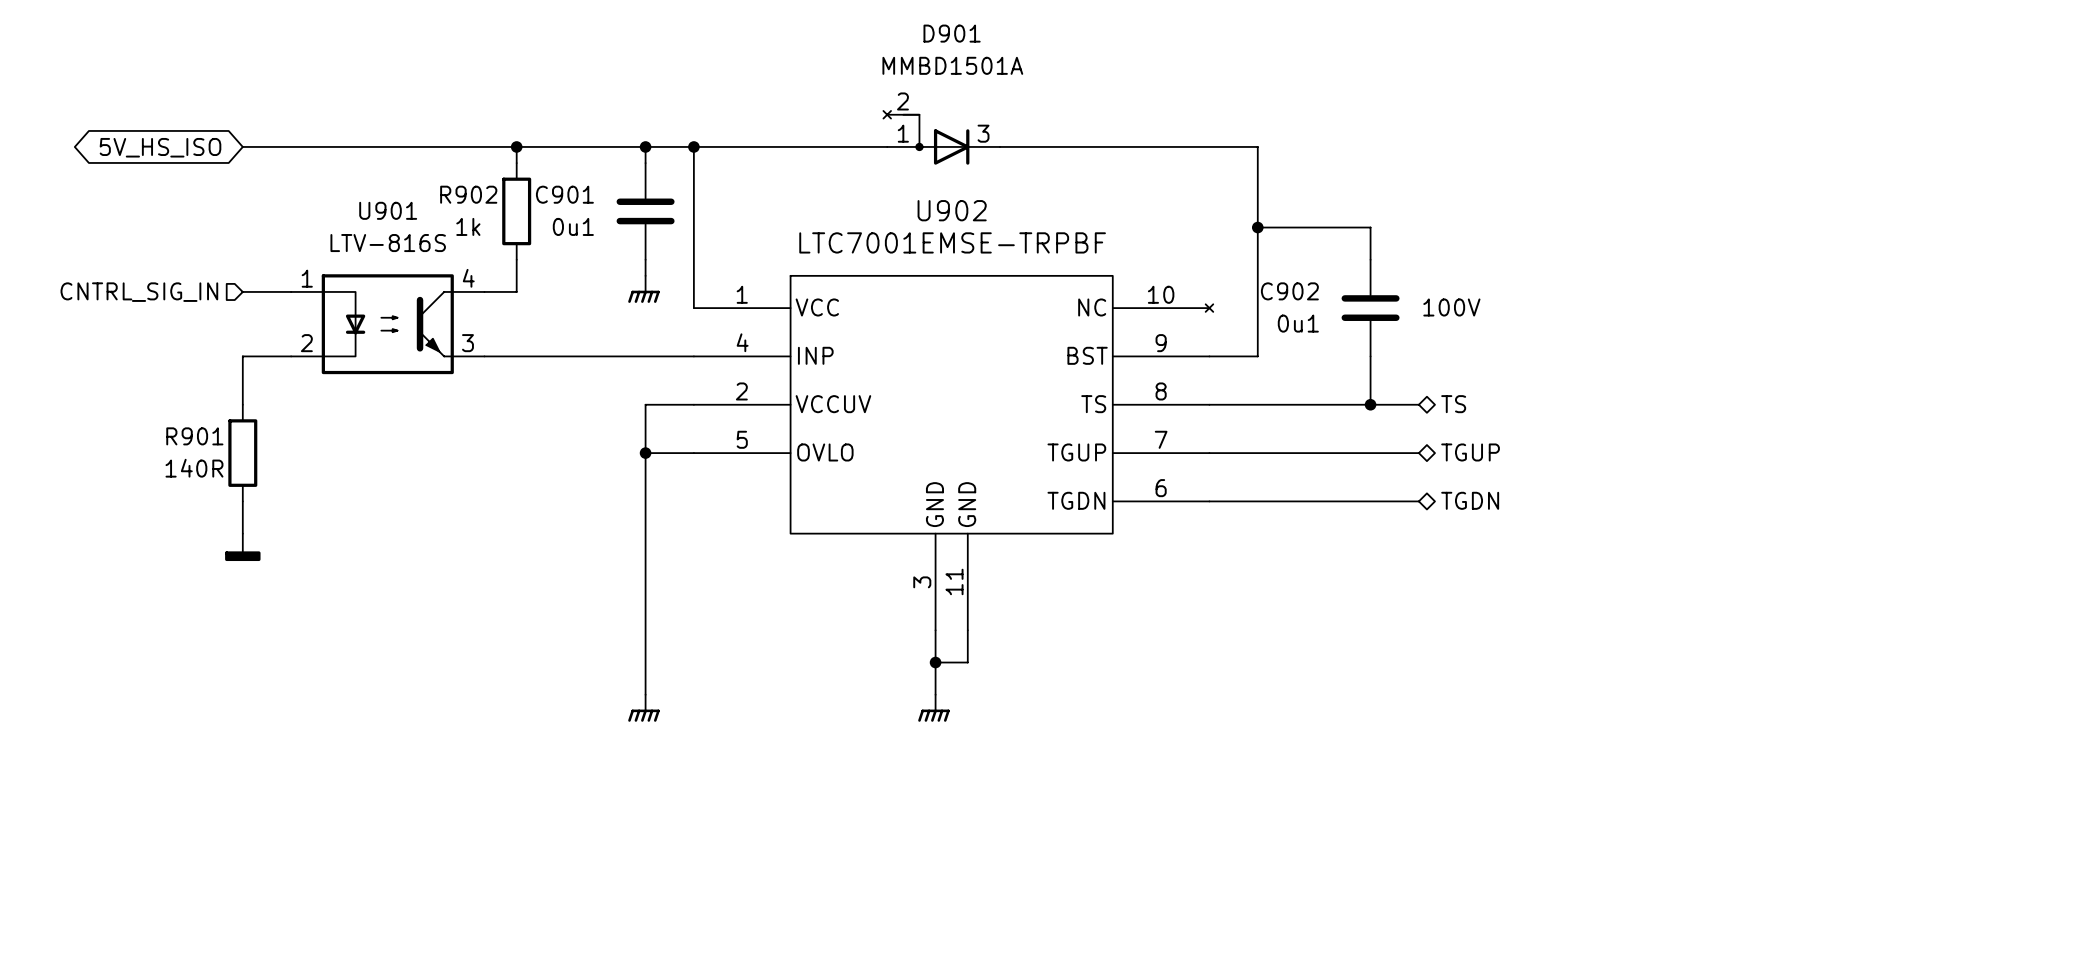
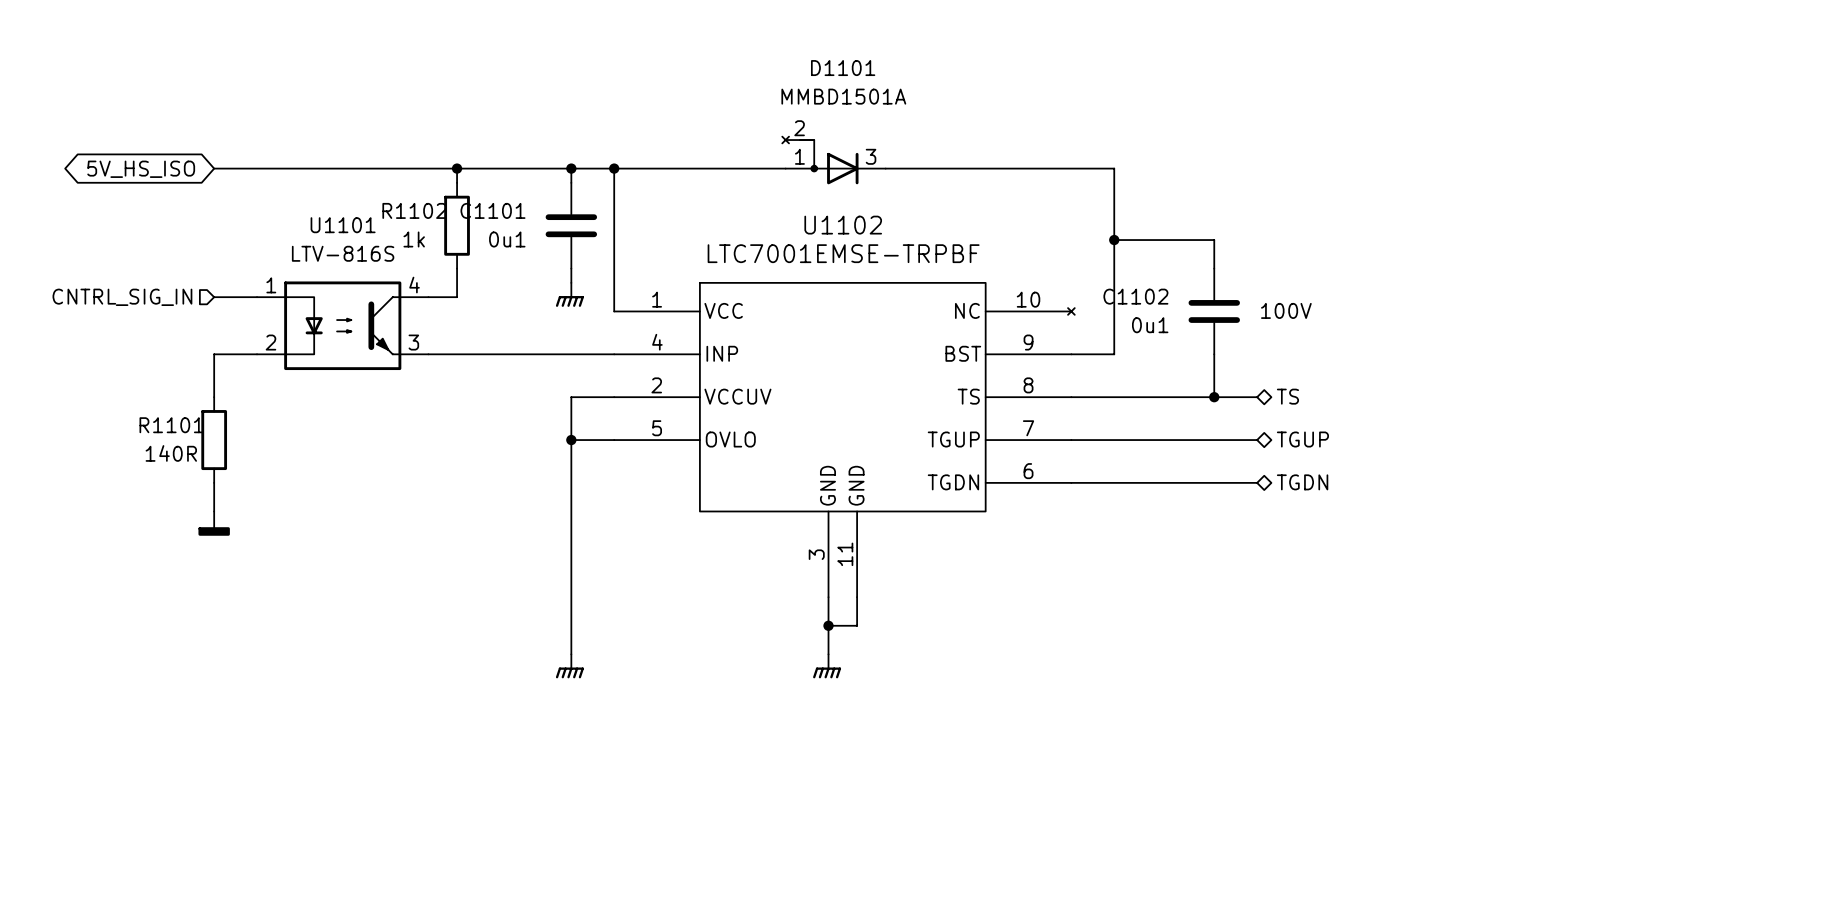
D901 name: D901 (952, 33) -> D1101 (843, 68)
R902 name: R902 (468, 194) -> R1102 (414, 210)
C901 name: C901 (564, 194) -> C1101 (493, 210)
U901 name: U901 (388, 210) -> U1101 (343, 225)
U902 name: U902 (952, 210) -> U1102 (843, 225)
C902 name: C902 (1289, 291) -> C1102 (1135, 296)
R901 name: R901 (194, 436) -> R1101 (171, 425)

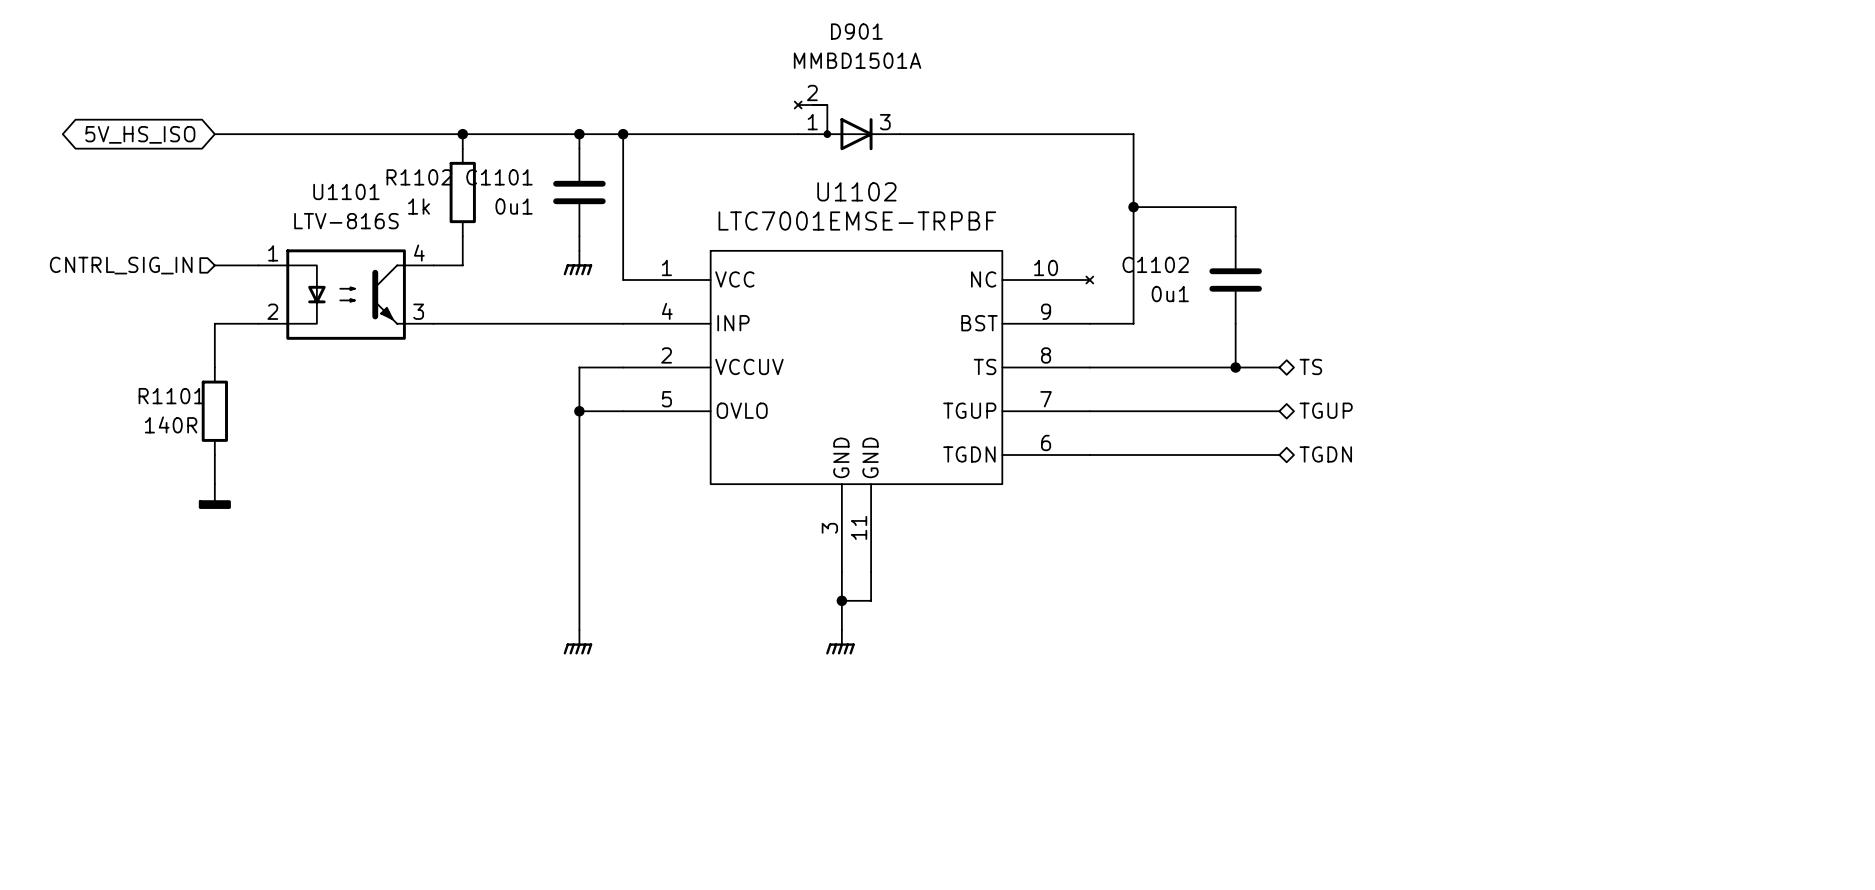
D1101 name: D1101 (843, 68) -> D901 (856, 31)
C1102 text: 100V (1286, 310) -> none

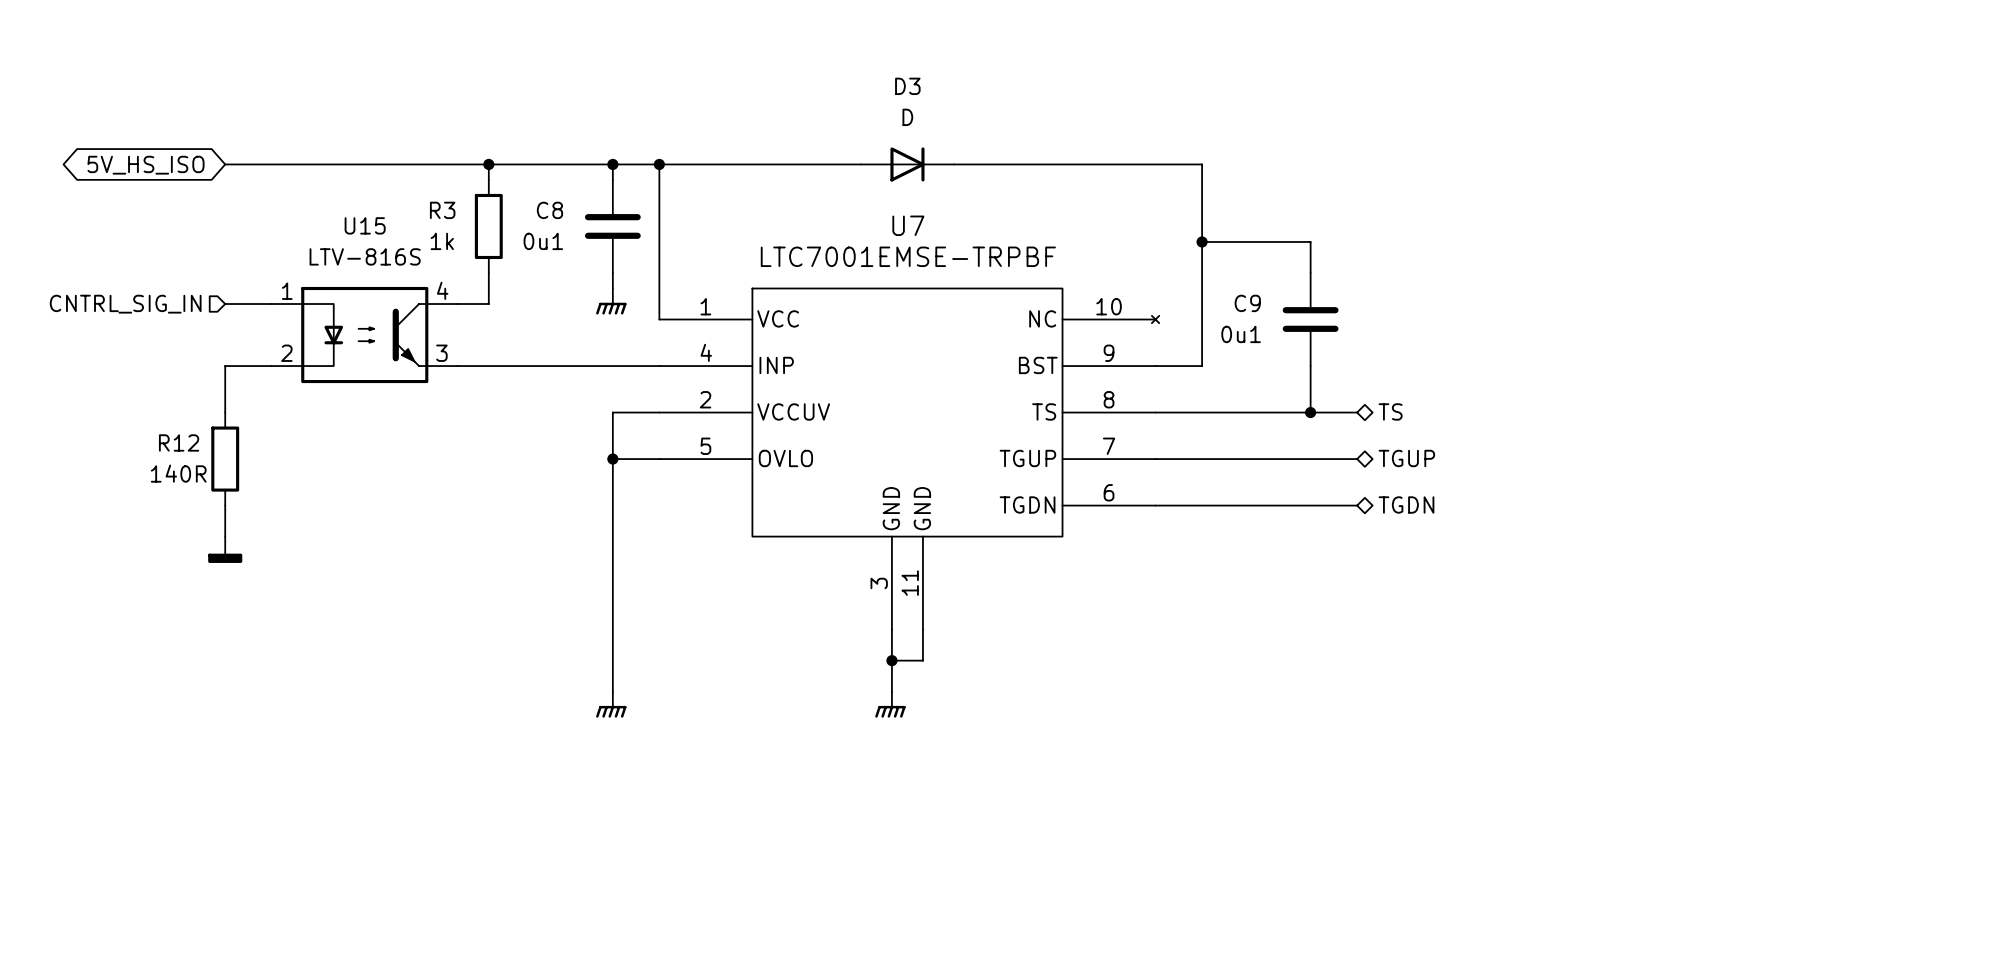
D901: MMBD1501A (847, 125) -> none
D3: none -> D (907, 164)
R1102 name: R1102 (419, 177) -> R3 (442, 210)
C1101 name: C1101 (499, 177) -> C8 (549, 210)
U1101 name: U1101 (346, 191) -> U15 (365, 225)
U1102 name: U1102 (856, 191) -> U7 (908, 225)
C1102 name: C1102 (1155, 264) -> C9 (1247, 303)
R1101 name: R1101 (171, 396) -> R12 (179, 442)

